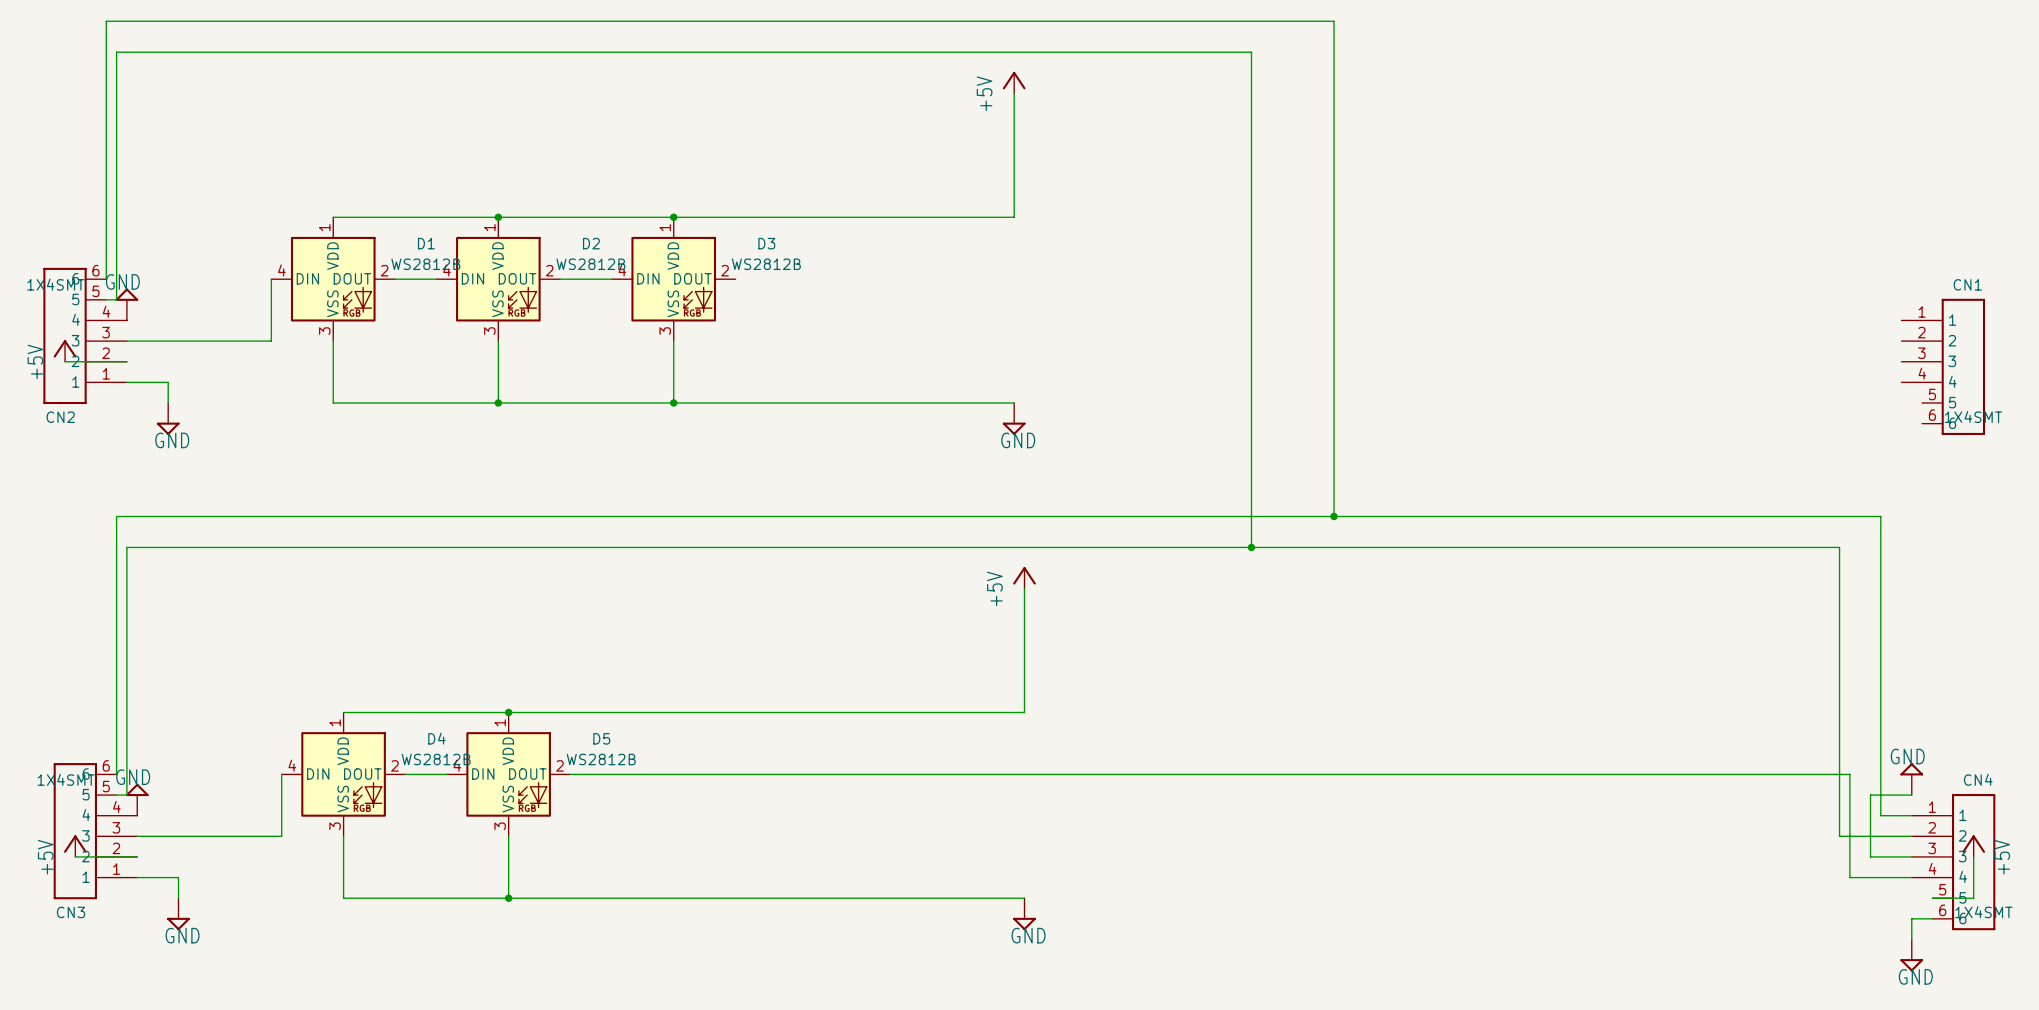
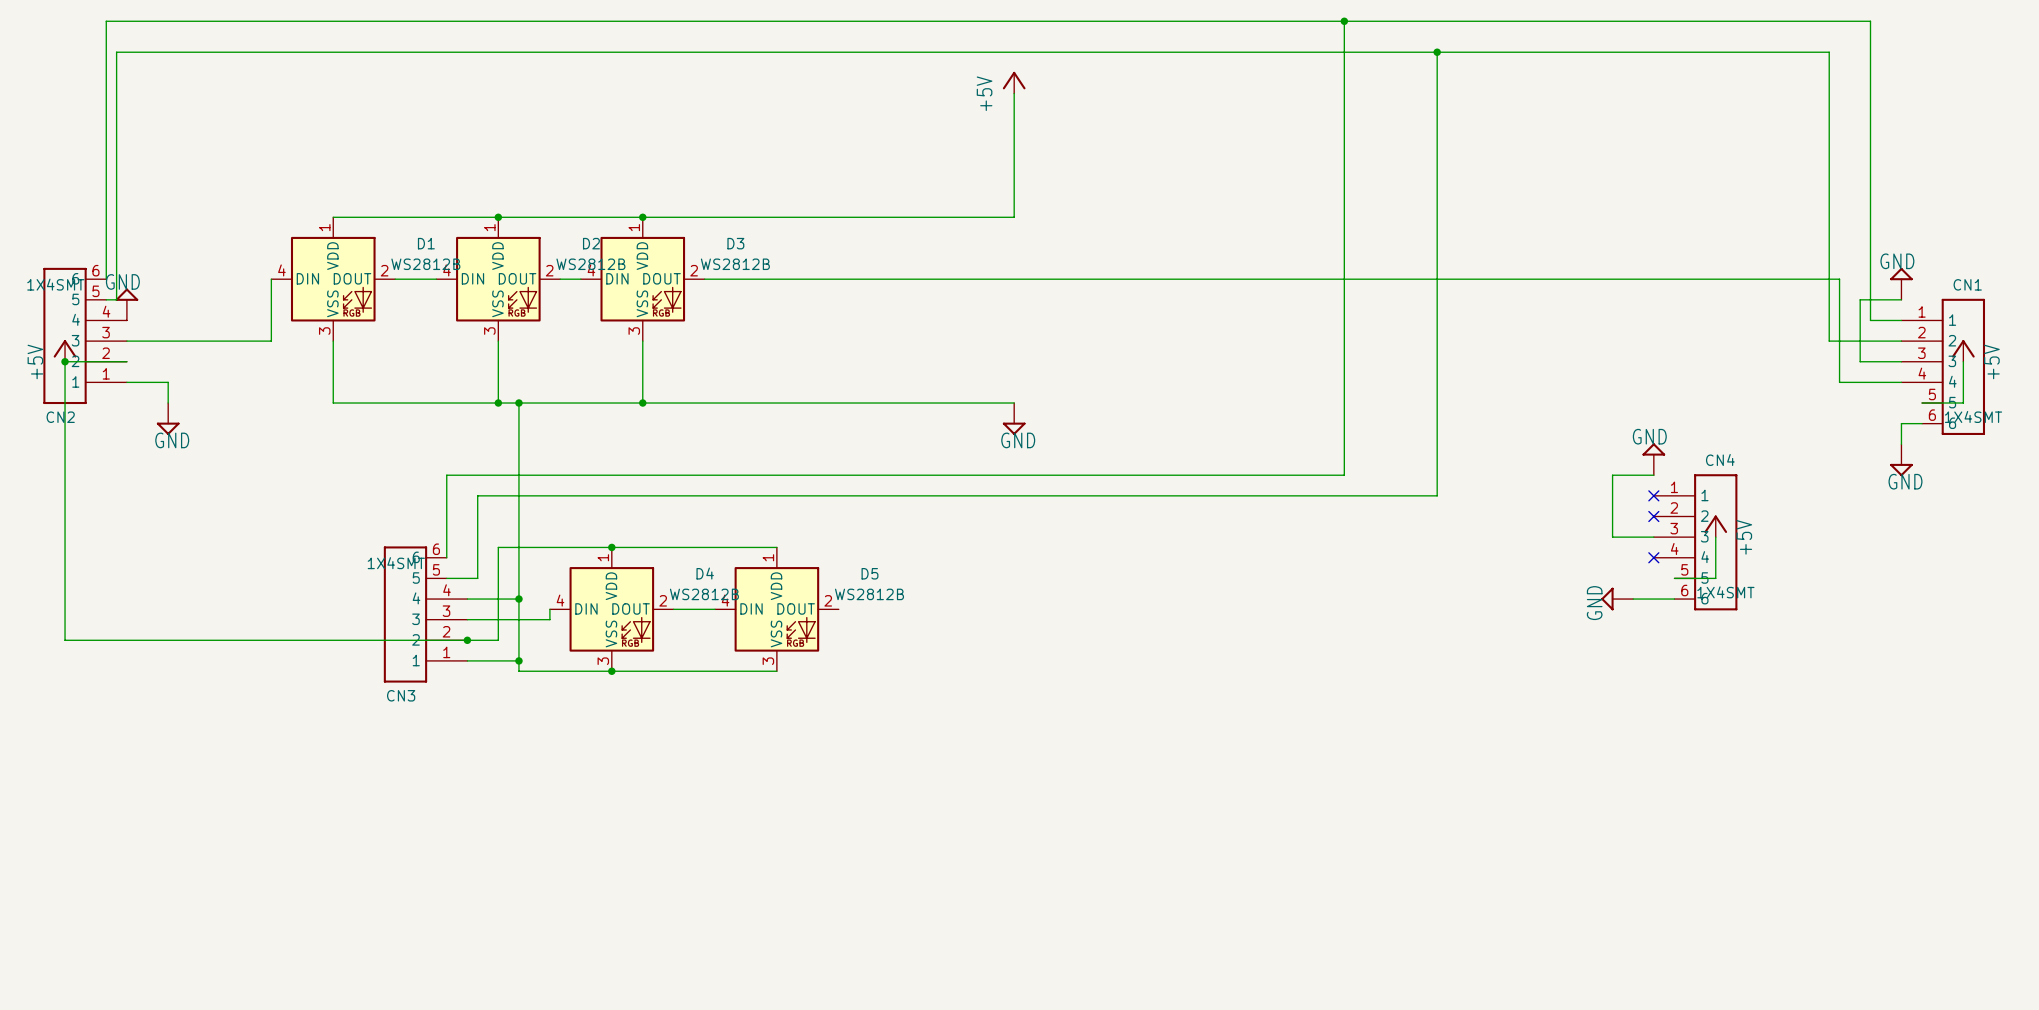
wire: (1334, 21) (1334, 516) -> (1334, 21) (1870, 21) (1870, 320) (1901, 320)
wire: none -> (1344, 21) (1344, 475) (446, 475) (446, 557)
junction: none -> (1344, 21)
wire: (1251, 52) (1251, 547) -> (1251, 52) (1829, 52) (1829, 341) (1901, 341)
wire: none -> (1437, 52) (1437, 495) (477, 495) (477, 578) (446, 578)
junction: none -> (1437, 52)
junction position: (673, 217) -> (642, 217)
D3 position: (673, 279) -> (642, 279)
wire: none -> (704, 279) (1839, 279) (1839, 382) (1901, 382)
power symbol: none -> GND (1901, 283)
wire: none -> (1901, 299) (1860, 299) (1860, 361) (1901, 361)
wire: (673, 341) (673, 403) -> (642, 341) (642, 403)
power symbol: none -> +5V (1963, 350)
junction: none -> (65, 361)
wire: none -> (1963, 361) (1963, 403) (1922, 403)
wire: none -> (518, 403) (518, 671) (776, 671)
junction: none -> (518, 403)
junction position: (673, 403) -> (642, 403)
wire: none -> (1922, 423) (1901, 423) (1901, 444)
power symbol: none -> GND (1653, 459)
power symbol: none -> GND (1901, 460)
wire: none -> (1653, 475) (1612, 475) (1612, 537) (1653, 537)
no-connect mark: none -> (1653, 495)
junction: (1334, 516) -> none
no-connect mark: none -> (1653, 516)
power symbol: none -> +5V (1715, 526)
wire: none -> (1715, 537) (1715, 578) (1674, 578)
wire: (498, 547) (126, 547) (126, 795) (116, 795) -> (498, 547) (498, 640) (65, 640) (65, 361)
junction: none -> (611, 547)
wire: (776, 547) (1839, 547) (1839, 836) (1911, 836) -> none
junction: (1251, 547) -> none
no-connect mark: none -> (1653, 557)
power symbol: +5V (1024, 577) -> none
wire: (1024, 588) (1024, 712) (343, 712) -> none
wire: none -> (467, 599) (518, 599)
junction: none -> (518, 599)
power symbol: none -> GND (1617, 599)
wire: none -> (1633, 599) (1674, 599)
wire: none -> (549, 609) (549, 619) (467, 619)
wire: none -> (673, 609) (714, 609)
junction: none -> (467, 640)
wire: none -> (467, 660) (518, 660)
junction: none -> (518, 660)
junction: none -> (611, 671)
junction: (508, 712) -> none
wire: (116, 774) (116, 516) (1880, 516) (1880, 815) (1911, 815) -> none
wire: (281, 774) (281, 836) (137, 836) -> none
D4 position: (343, 774) -> (611, 609)
wire: (405, 774) (446, 774) -> none
D5 position: (508, 774) -> (776, 609)
wire: (570, 774) (1849, 774) (1849, 877) (1911, 877) -> none
power symbol: GND (1911, 779) -> none
wire: (1911, 795) (1870, 795) (1870, 856) (1911, 856) -> none
power symbol: GND (137, 799) -> none
CN3 position: (95, 831) -> (425, 614)
wire: (343, 836) (343, 898) (1024, 898) -> none
wire: (508, 836) (508, 898) -> none
power symbol: +5V (75, 846) -> none
power symbol: +5V (1973, 846) -> none
wire: (75, 856) (137, 856) -> none
wire: (1973, 856) (1973, 898) (1932, 898) -> none
CN4 position: (1953, 862) -> (1695, 542)
wire: (137, 877) (178, 877) (178, 898) -> none
junction: (508, 898) -> none
power symbol: GND (178, 914) -> none
power symbol: GND (1024, 914) -> none
wire: (1932, 918) (1911, 918) (1911, 939) -> none
power symbol: GND (1911, 955) -> none

